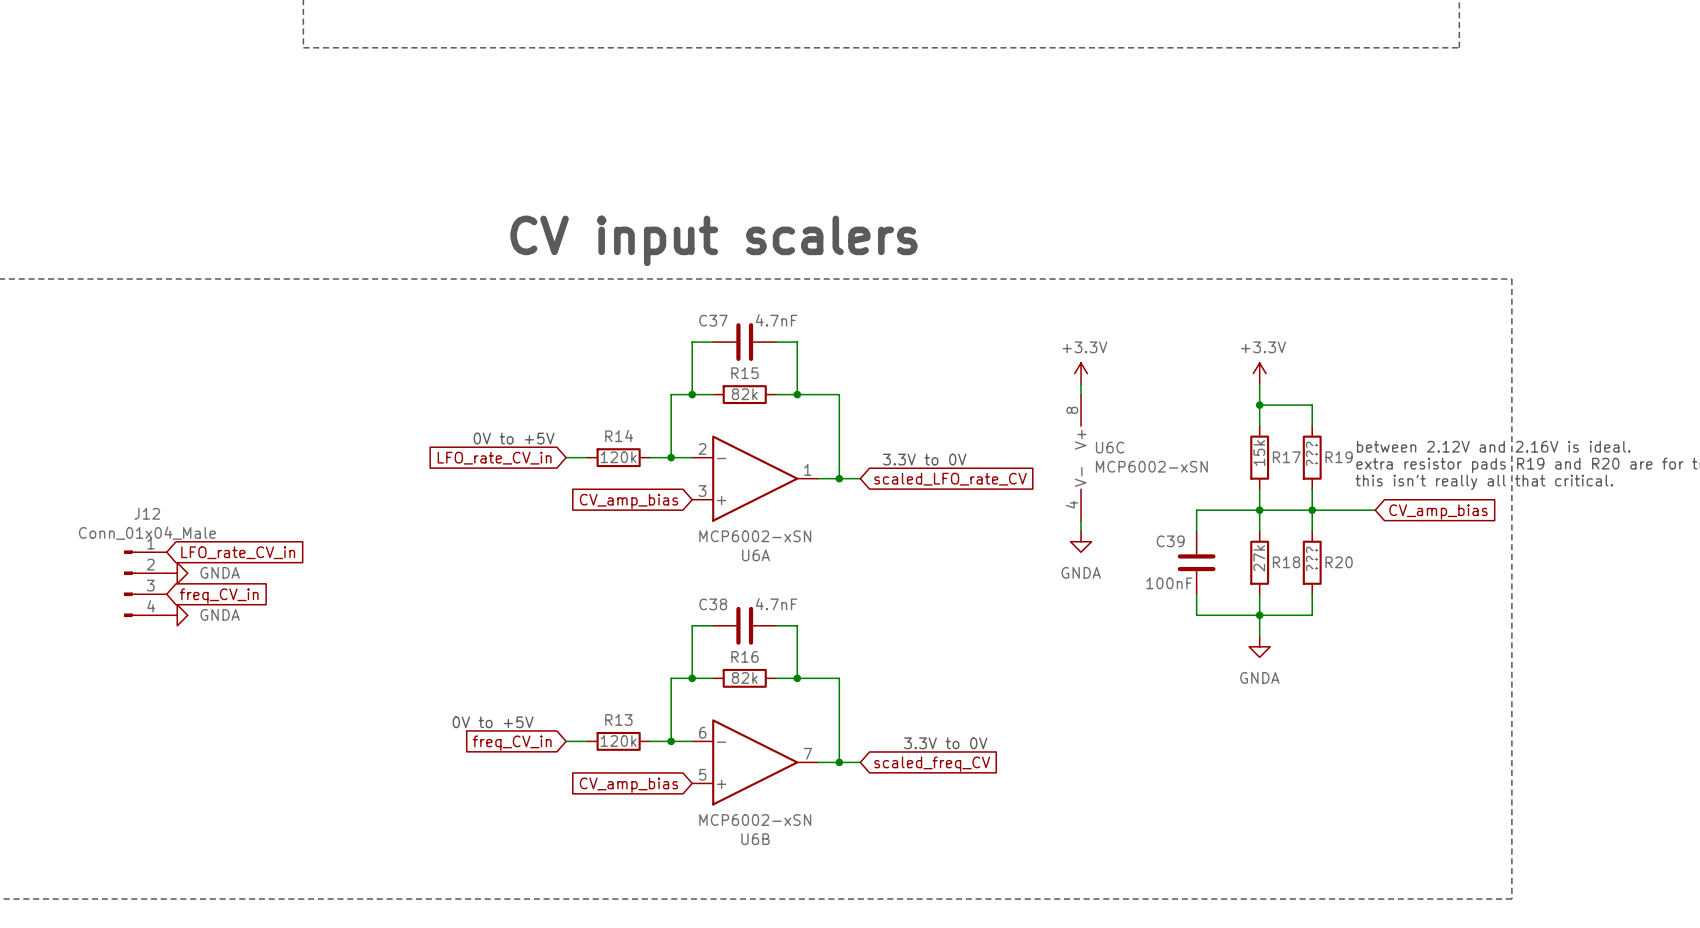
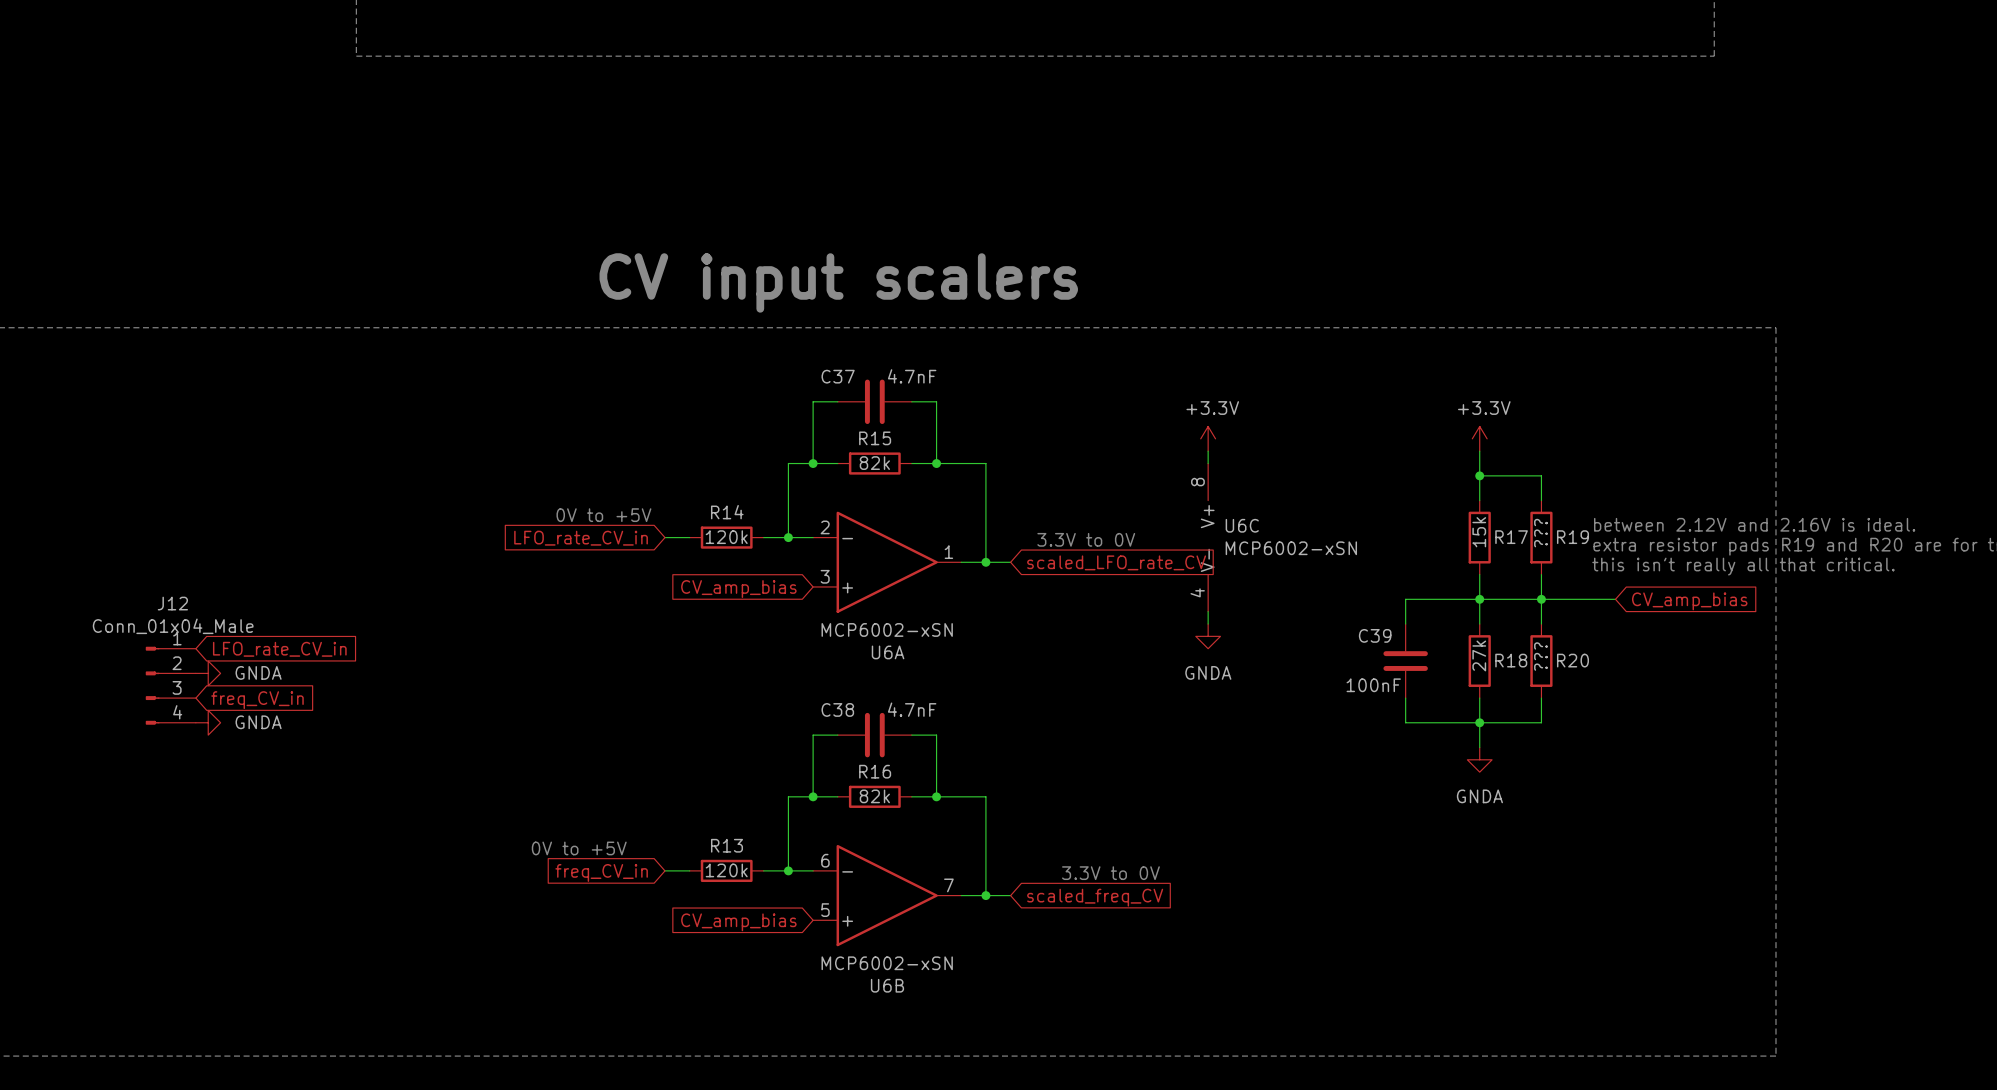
power symbol position: +3.3V (1081, 373) -> +3.3V (1208, 438)
wire: (1081, 384) (1081, 394) -> (1208, 451) (1208, 463)
U6C position: (1081, 457) -> (1208, 537)
wire: (1081, 520) (1081, 531) -> (1208, 611) (1208, 624)
power symbol position: GNDA (1081, 541) -> GNDA (1208, 636)

